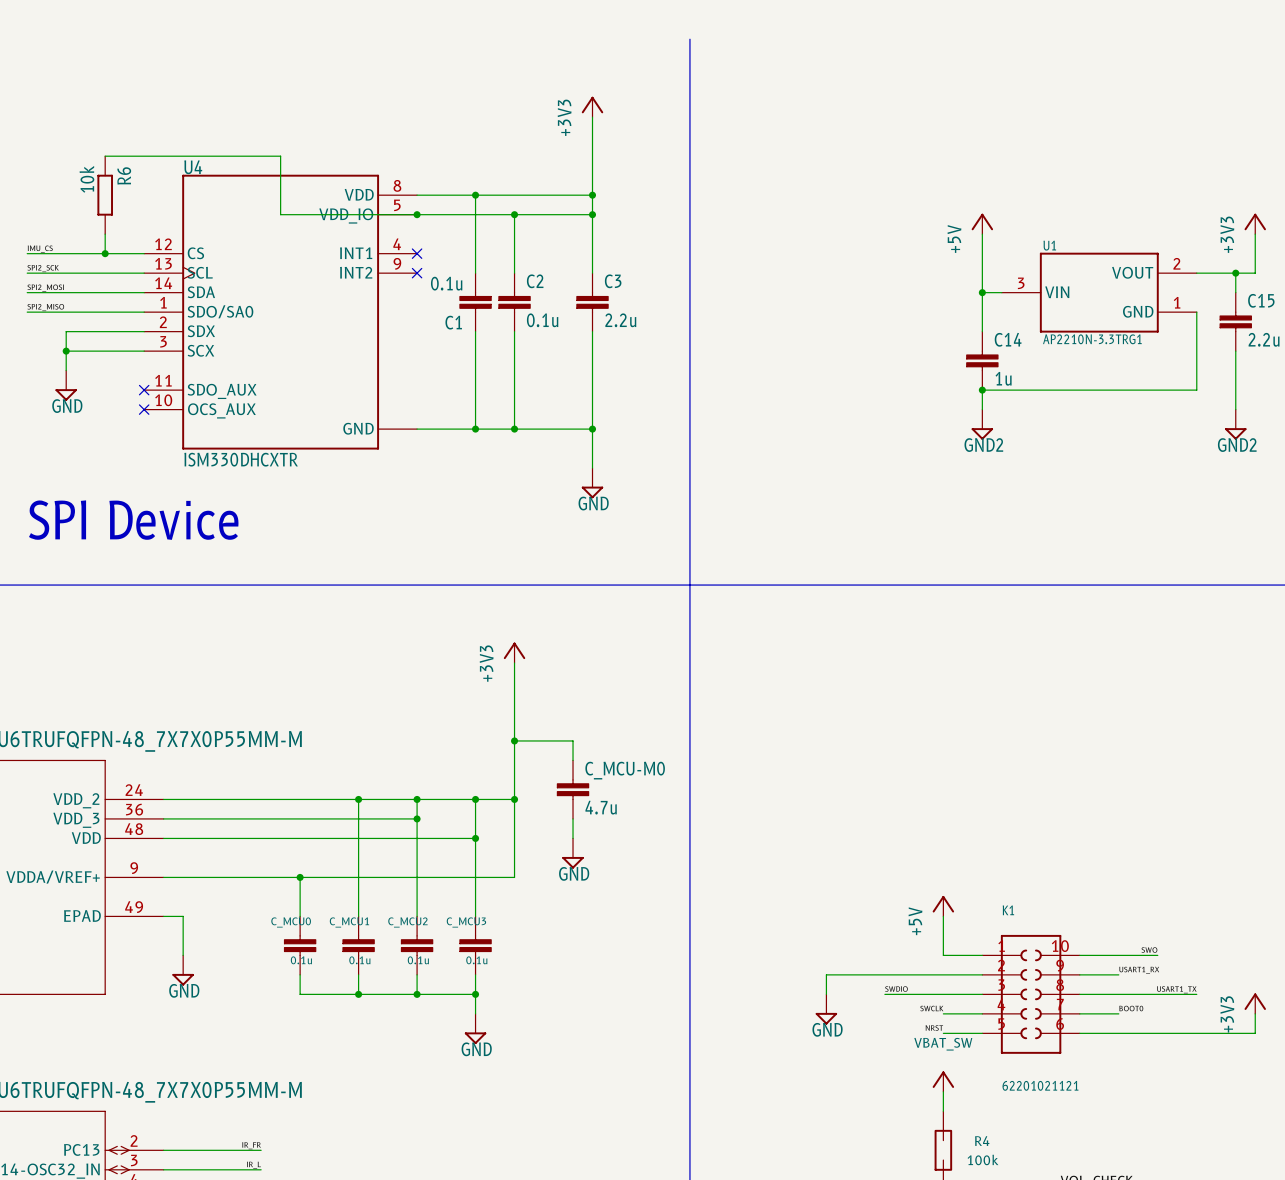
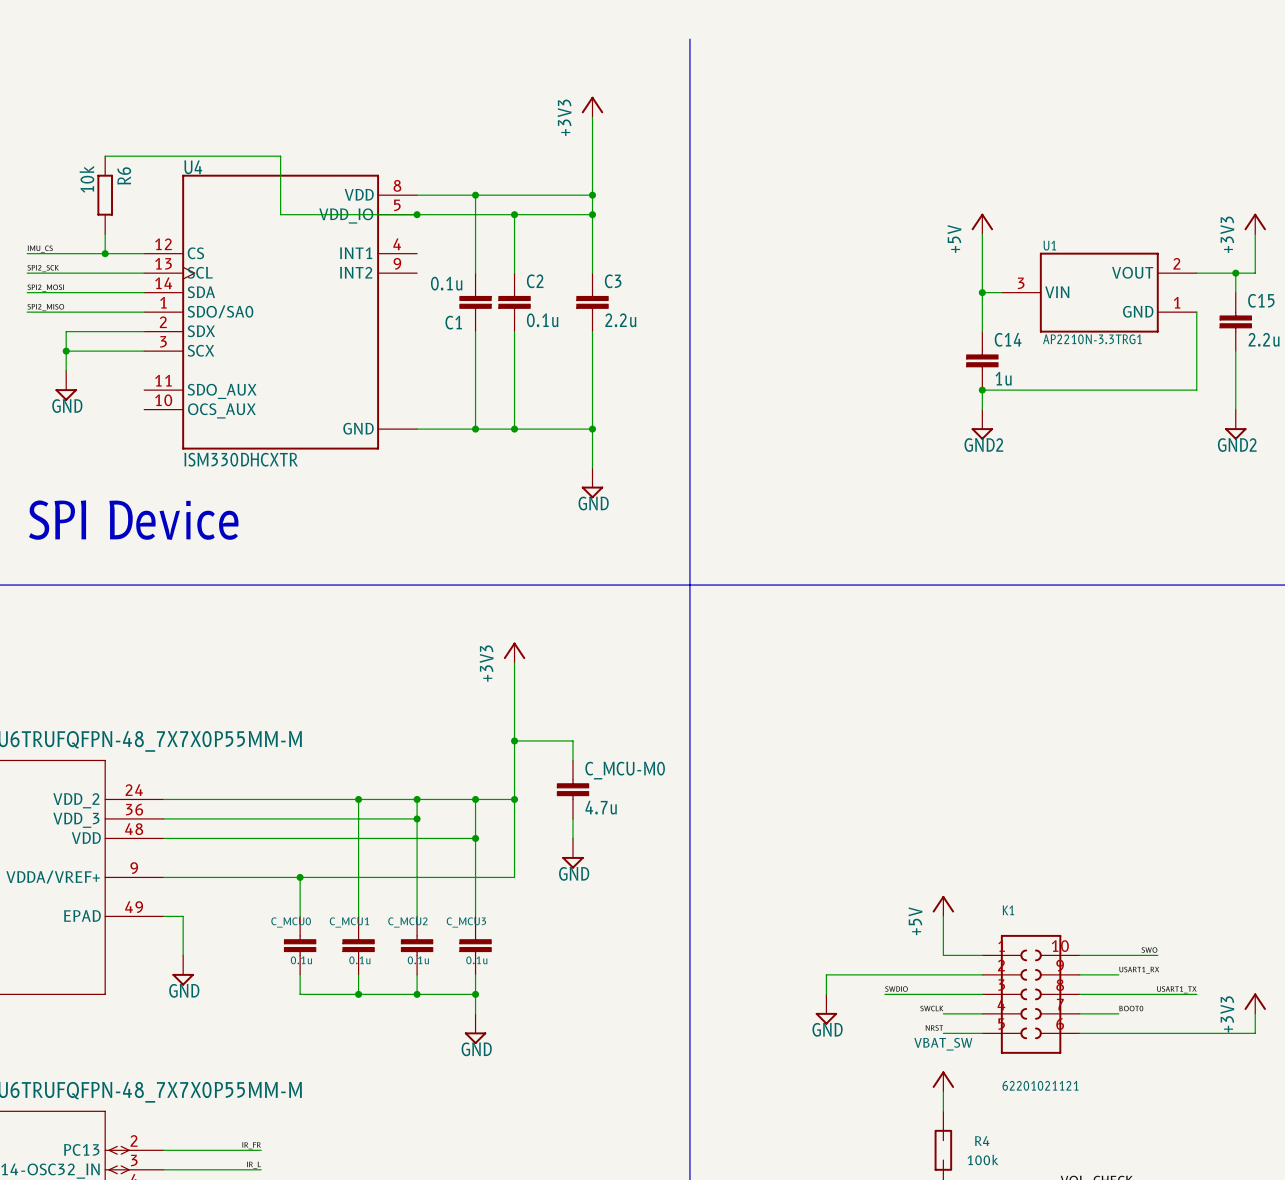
no-connect mark: (417, 253) -> none
no-connect mark: (417, 273) -> none
no-connect mark: (144, 390) -> none
no-connect mark: (144, 409) -> none

